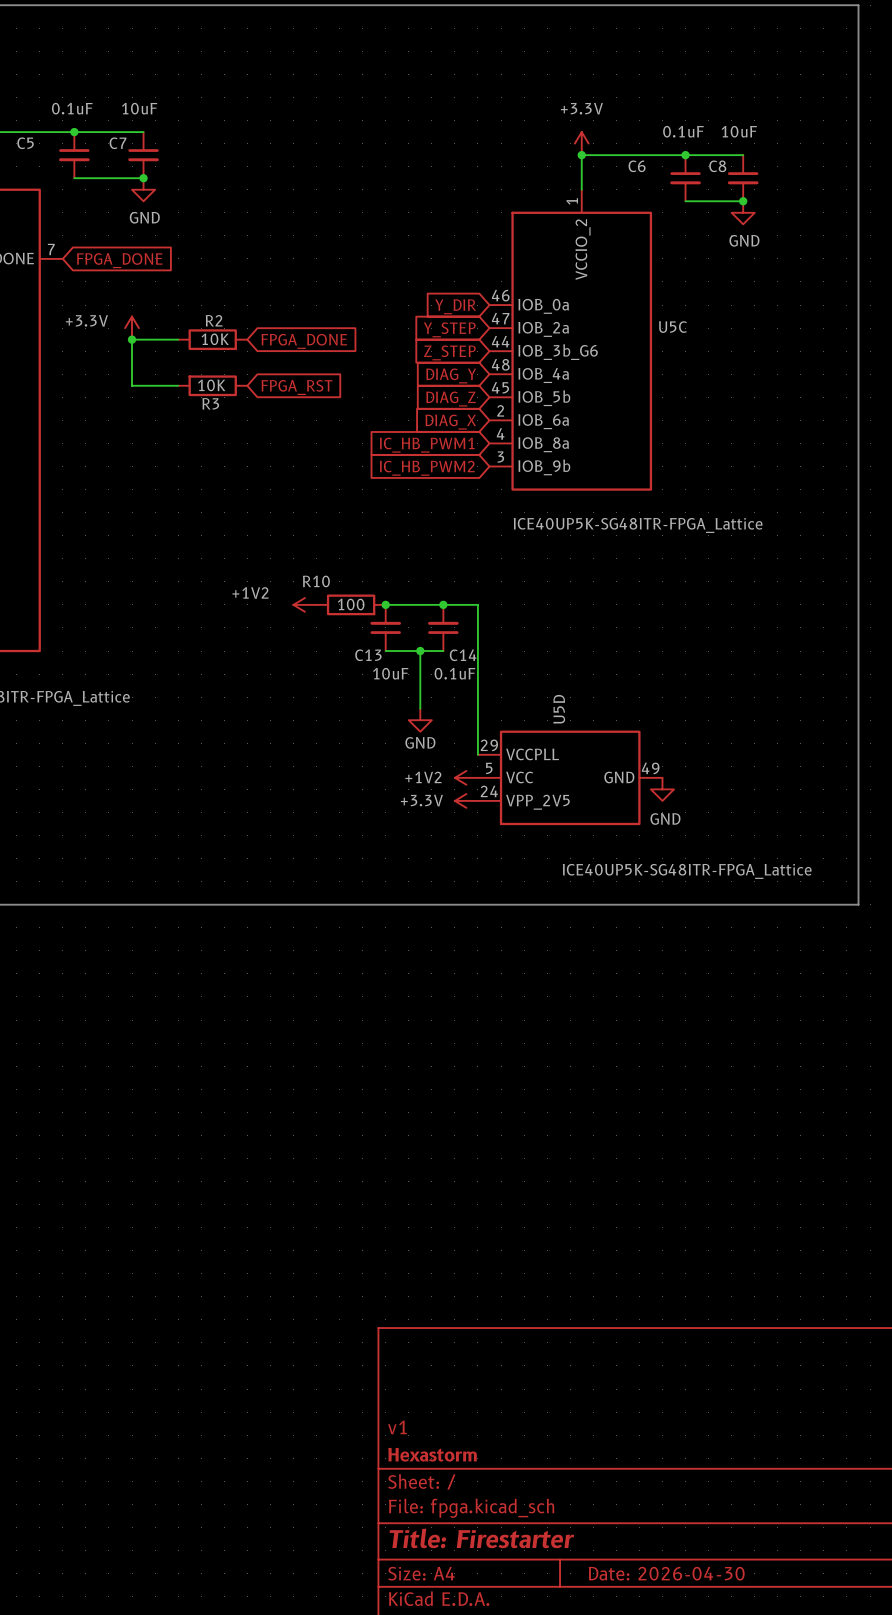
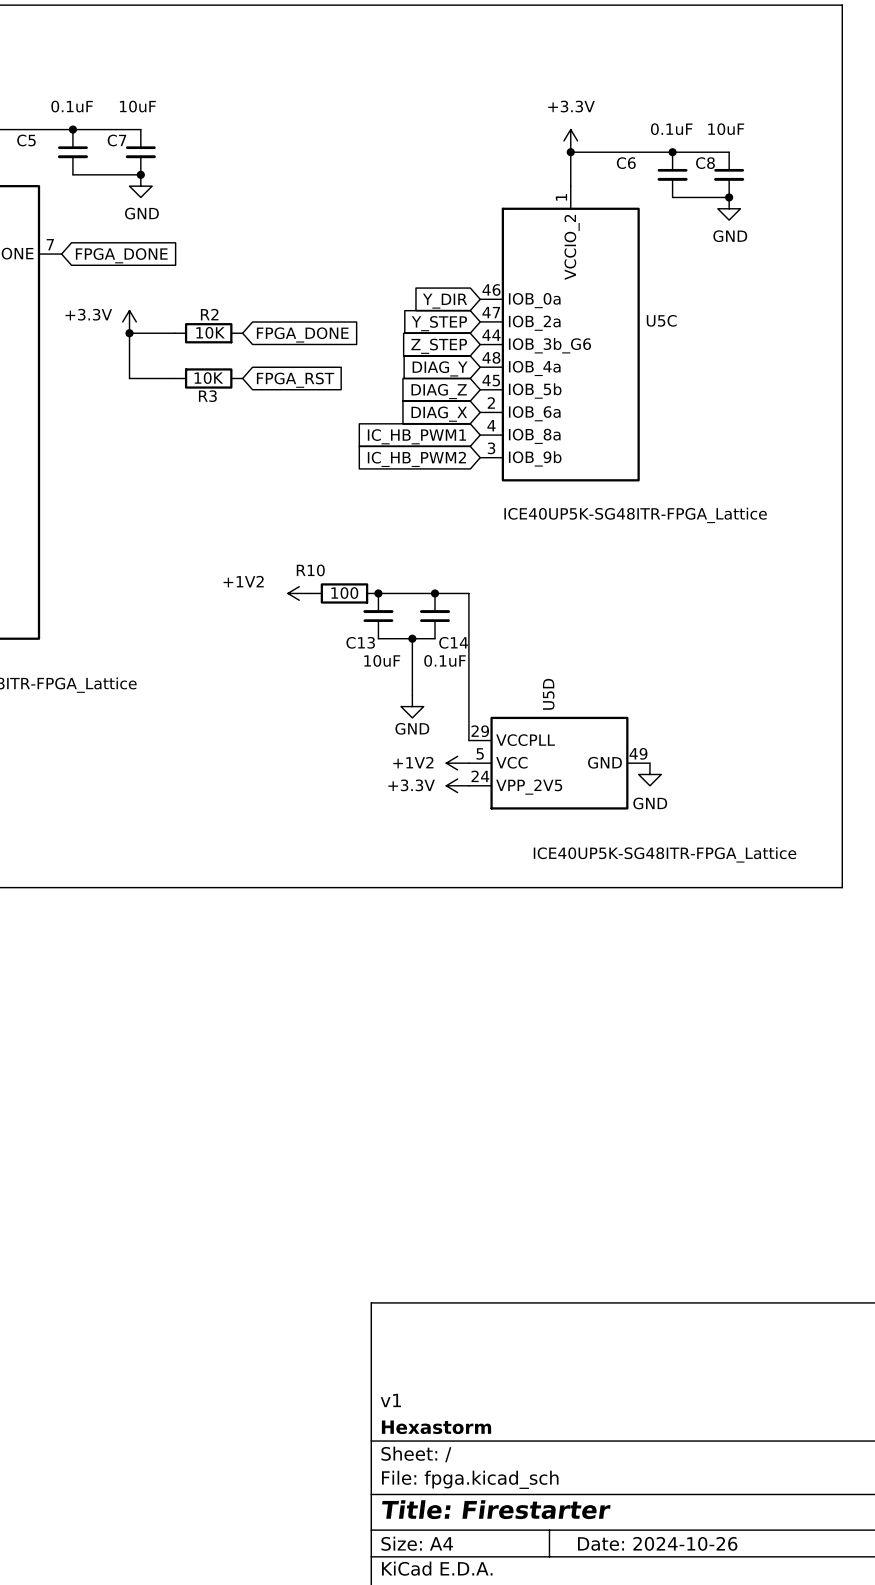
title block: Date: 2026-04-30 (666, 1573) -> Date: 2024-10-26 (657, 1543)

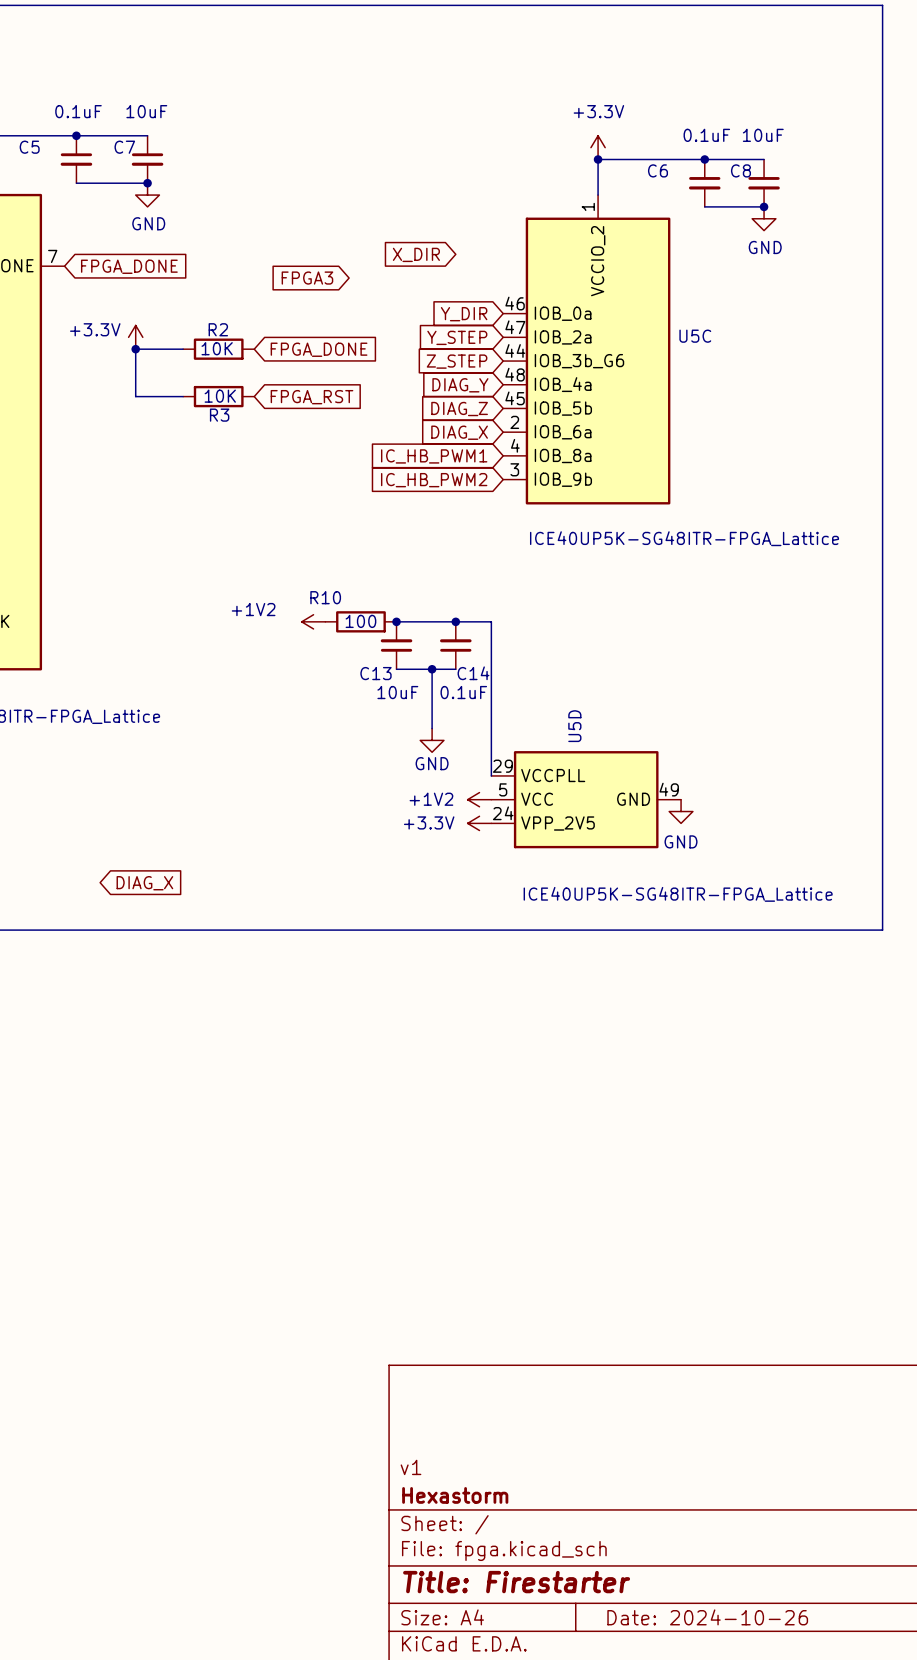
global label: none -> X_DIR (416, 254)
global label: none -> FPGA3 (307, 278)
global label: none -> DIAG_X (144, 883)

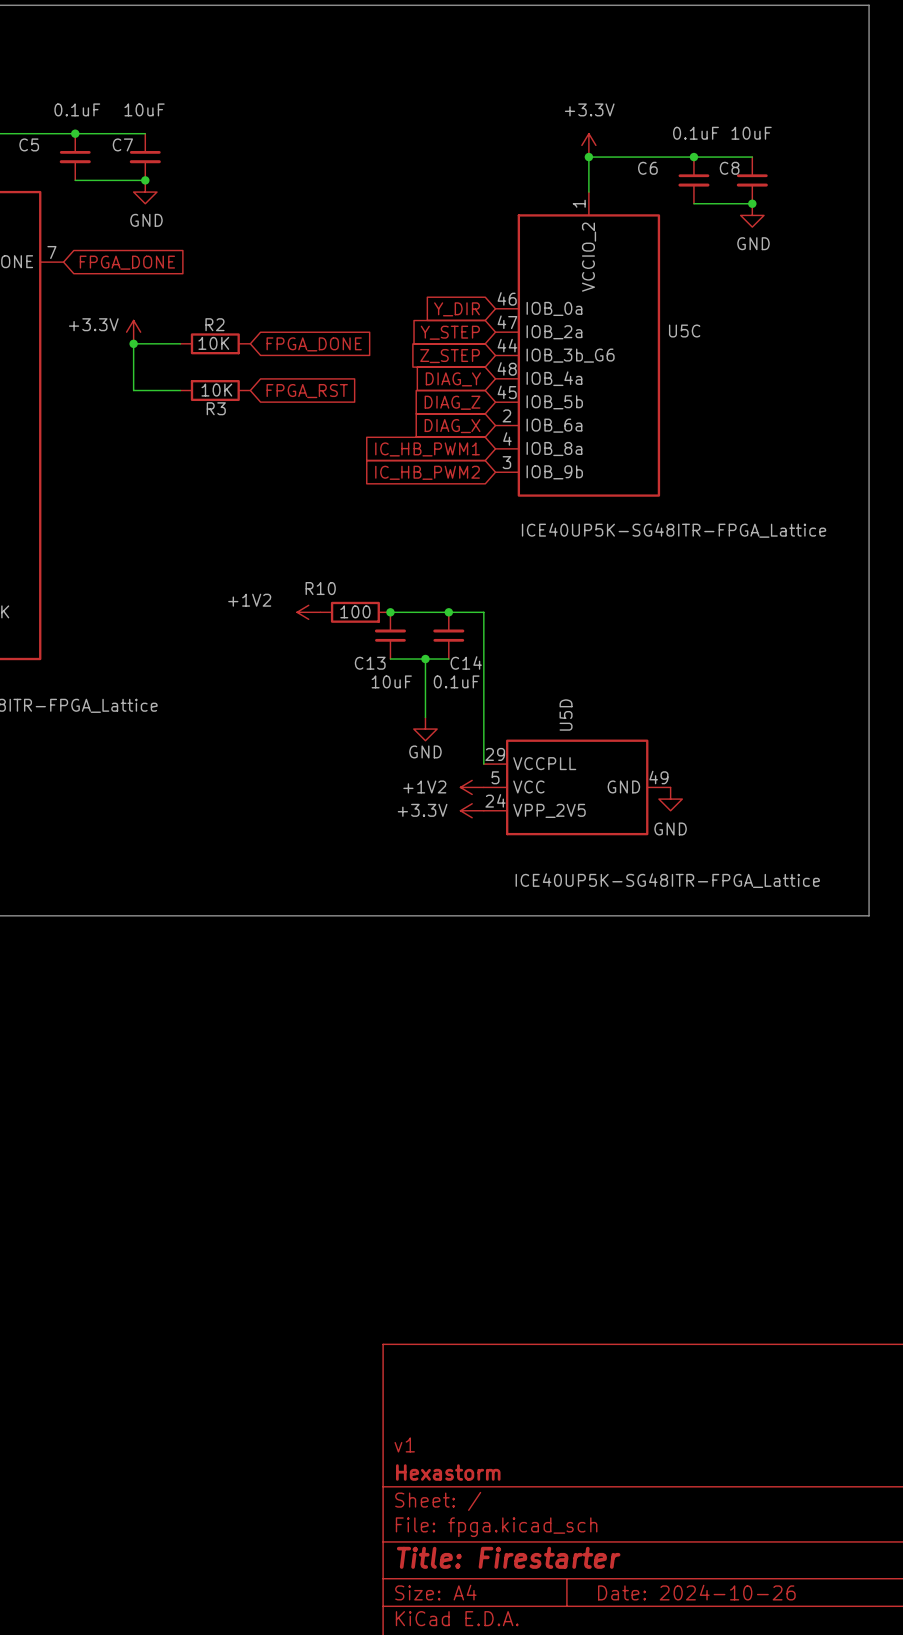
global label: X_DIR (416, 254) -> none
global label: FPGA3 (307, 278) -> none
global label: DIAG_X (144, 883) -> none

